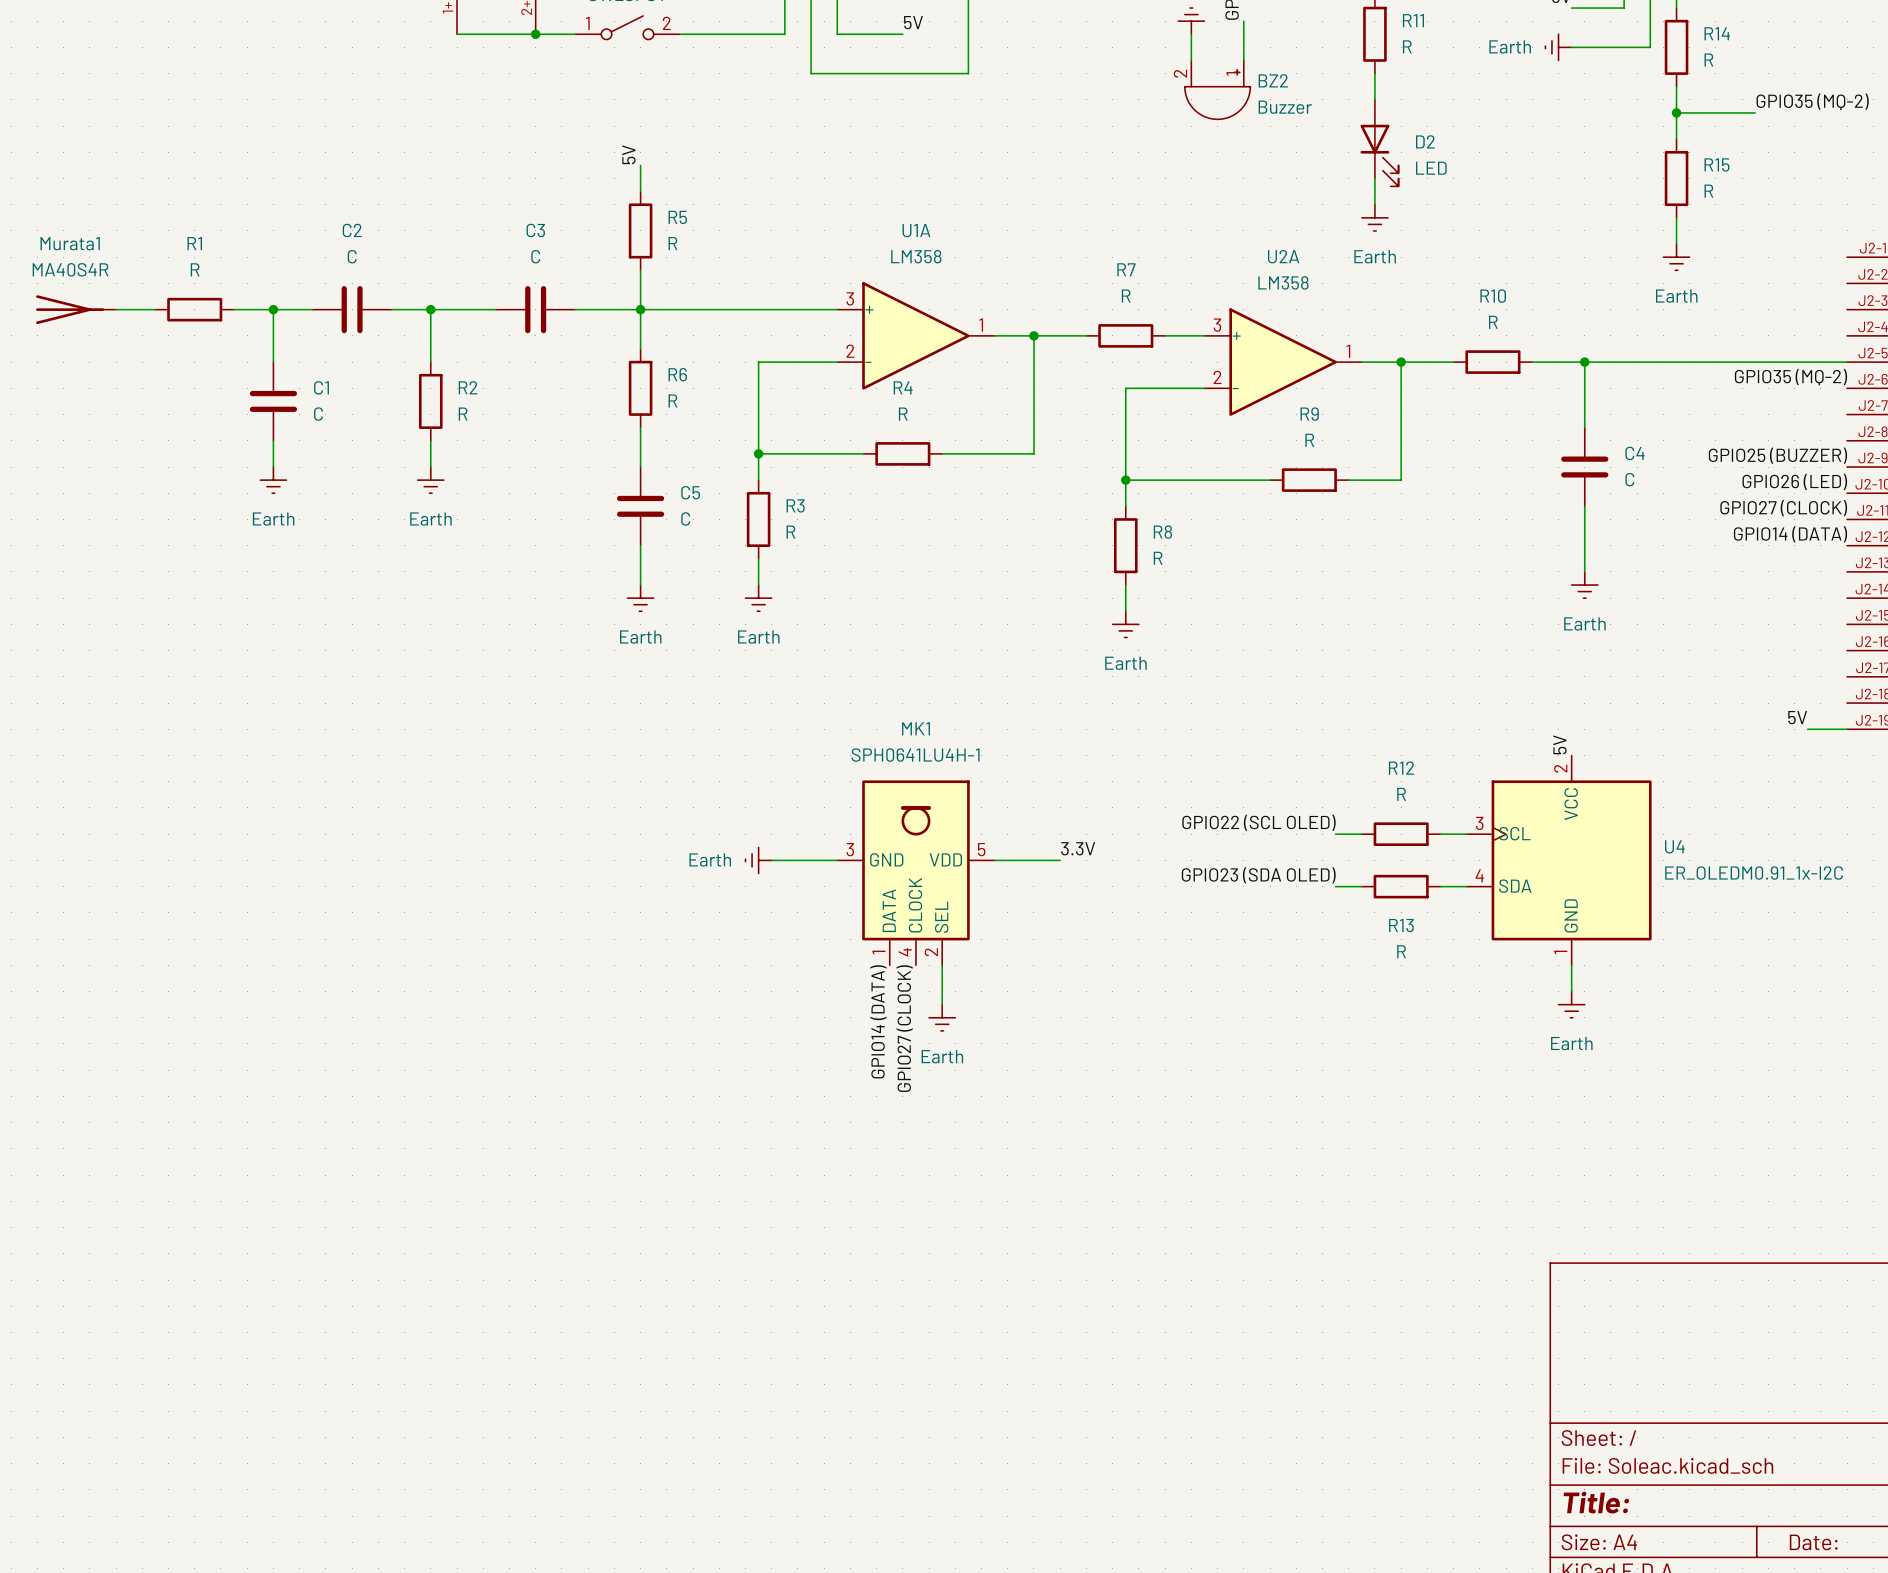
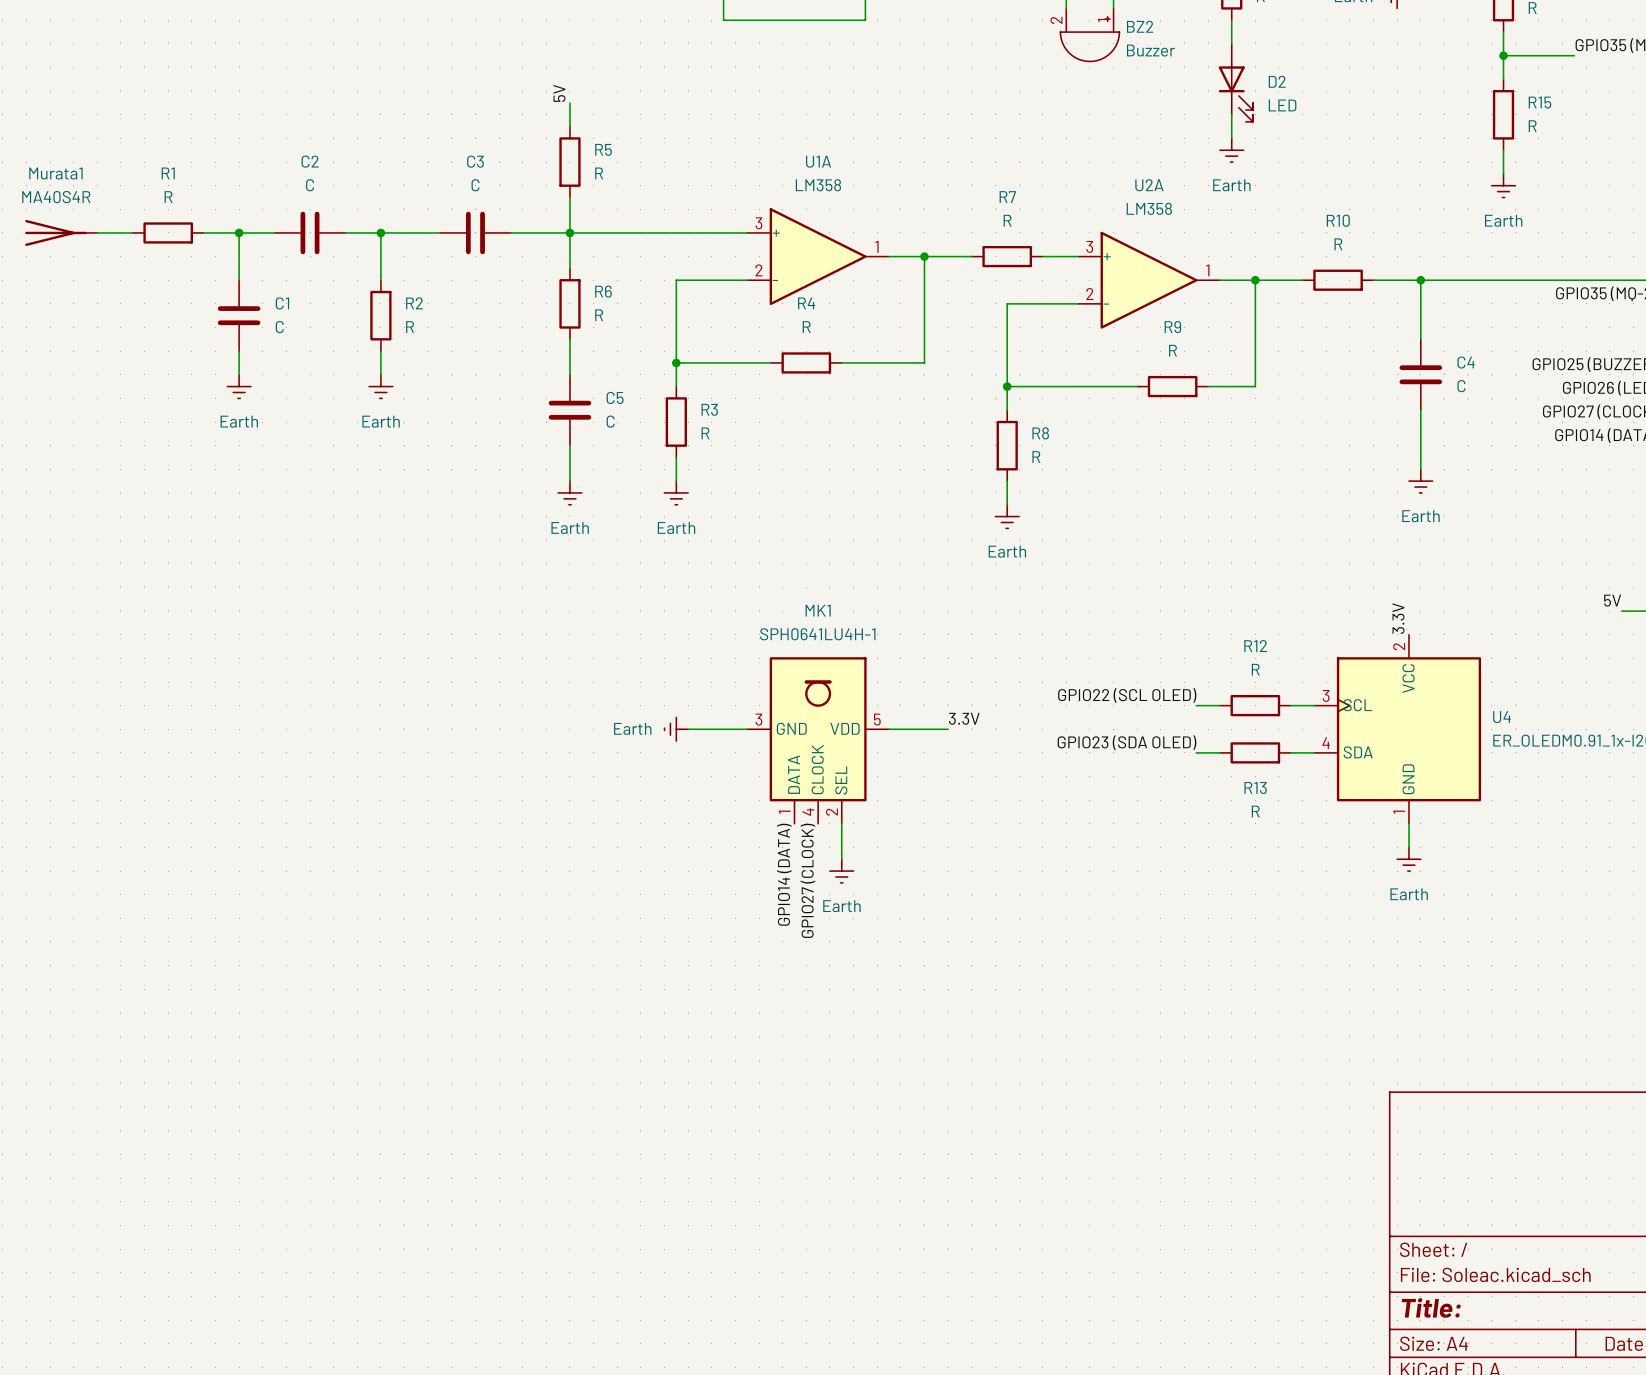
label: 5V (1560, 744) -> 3.3V (1398, 618)

